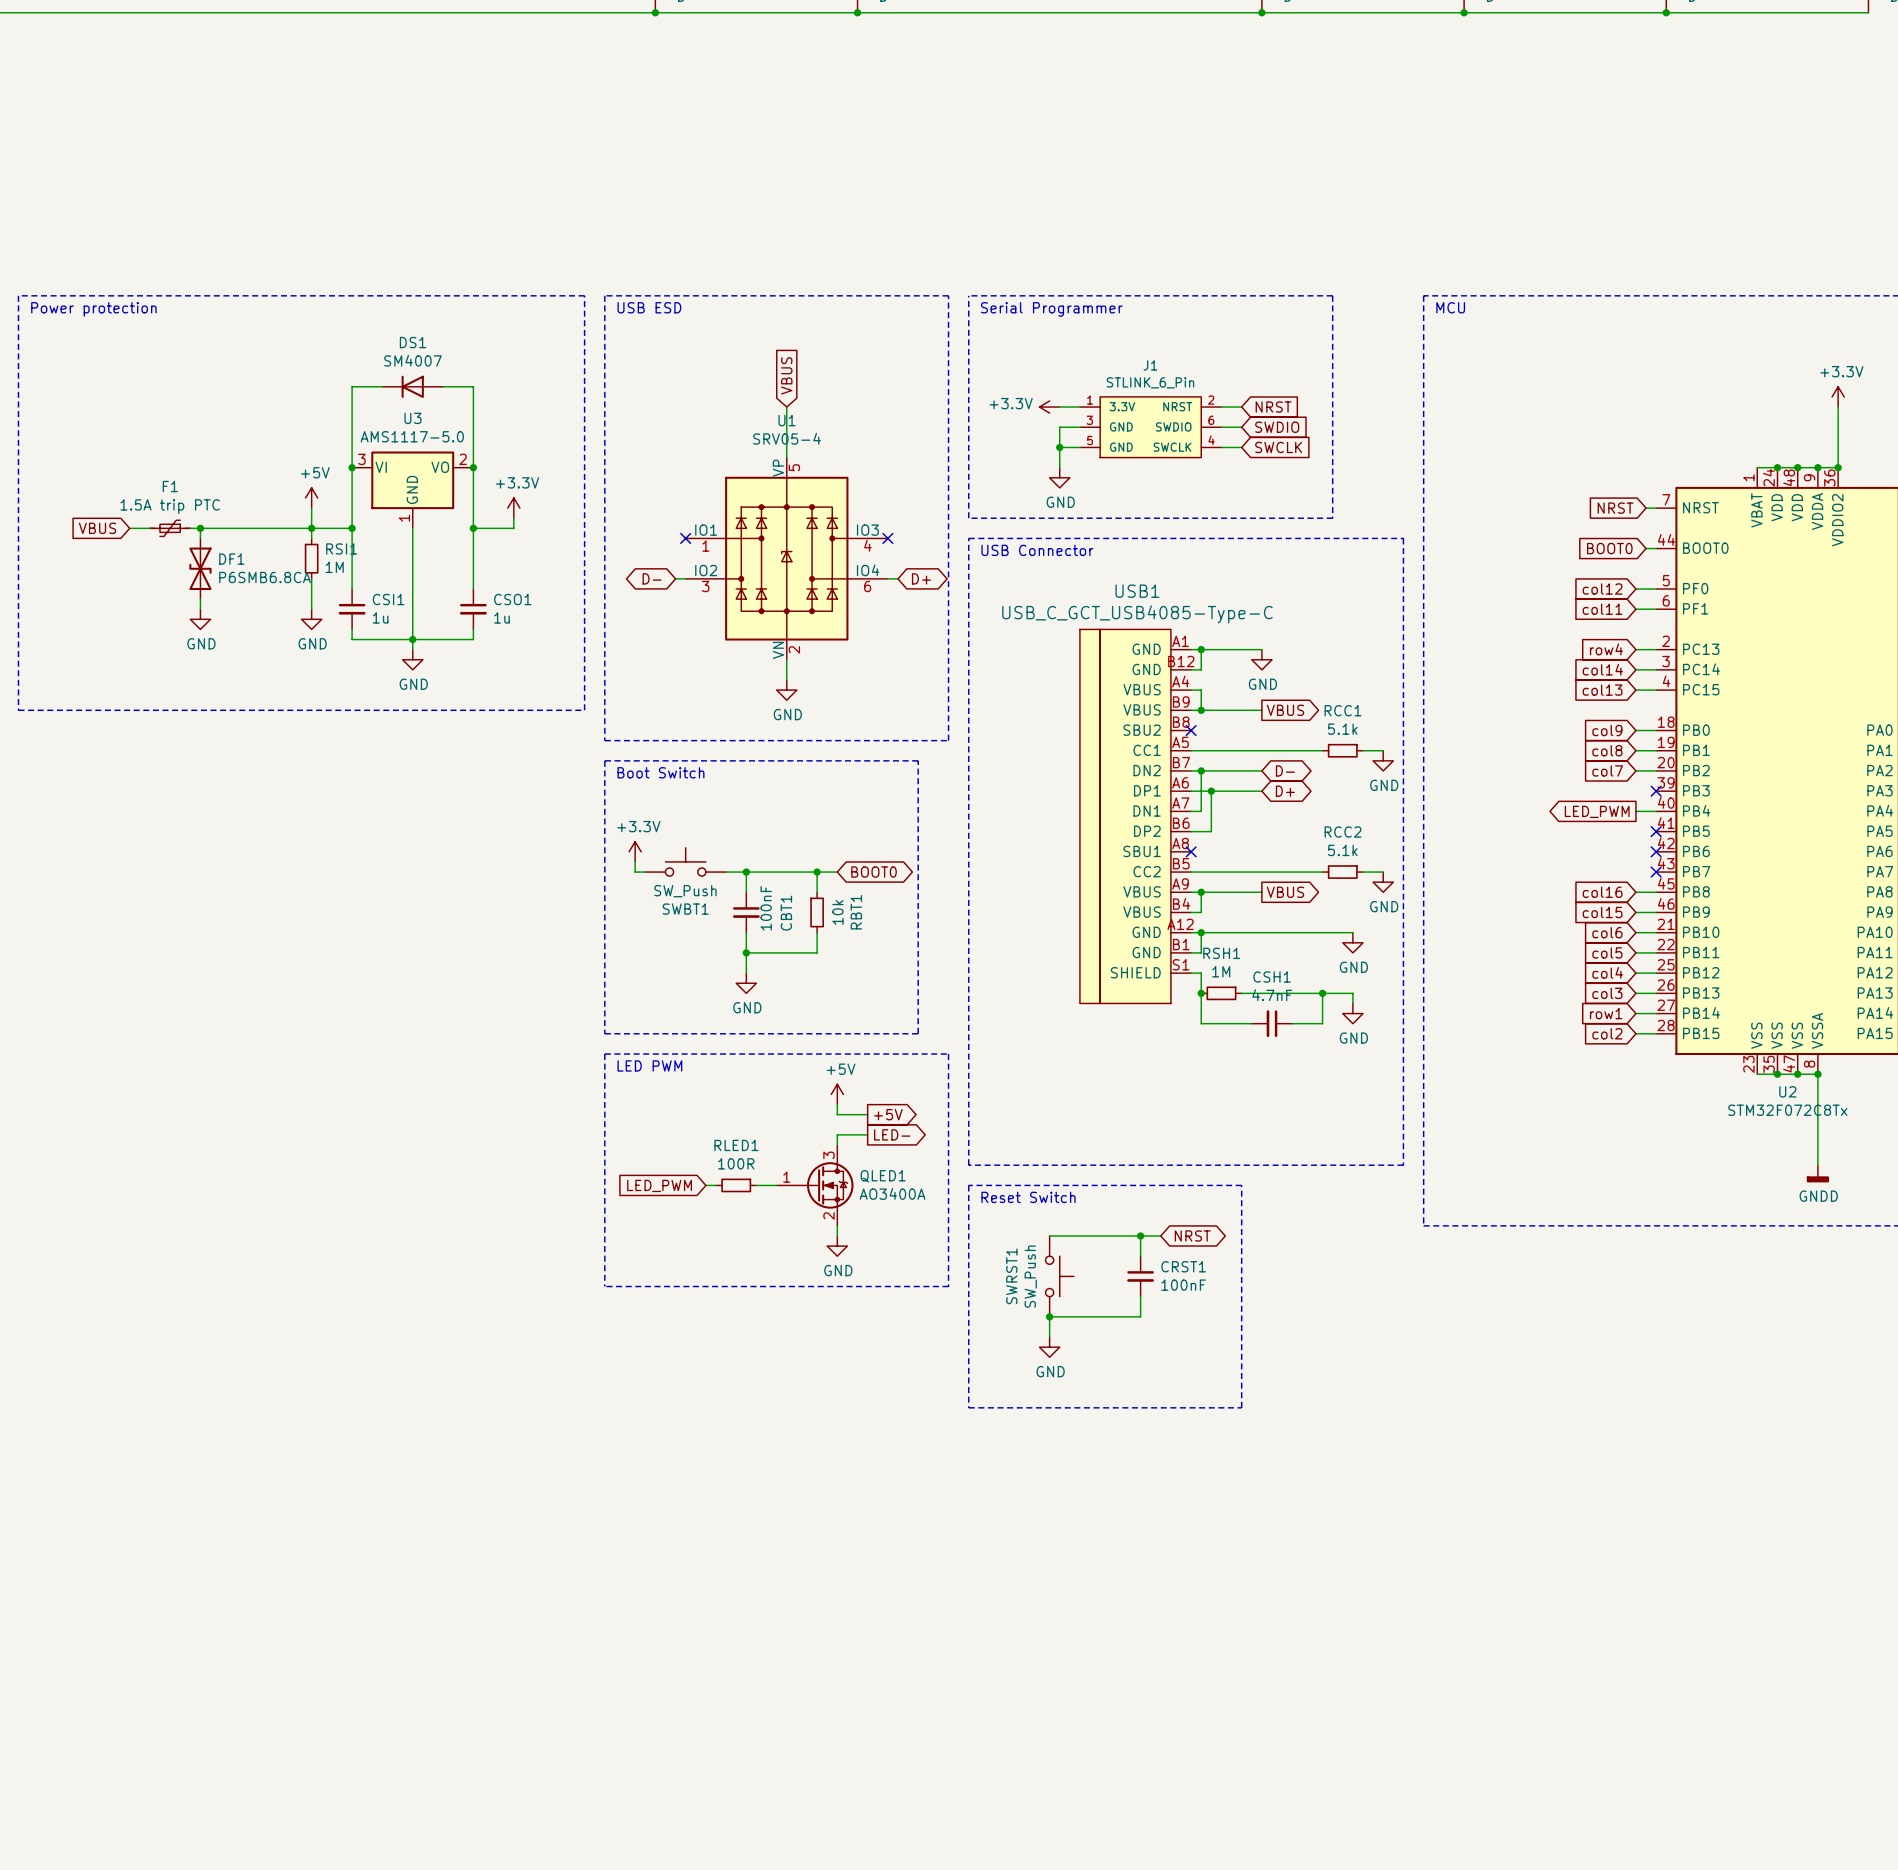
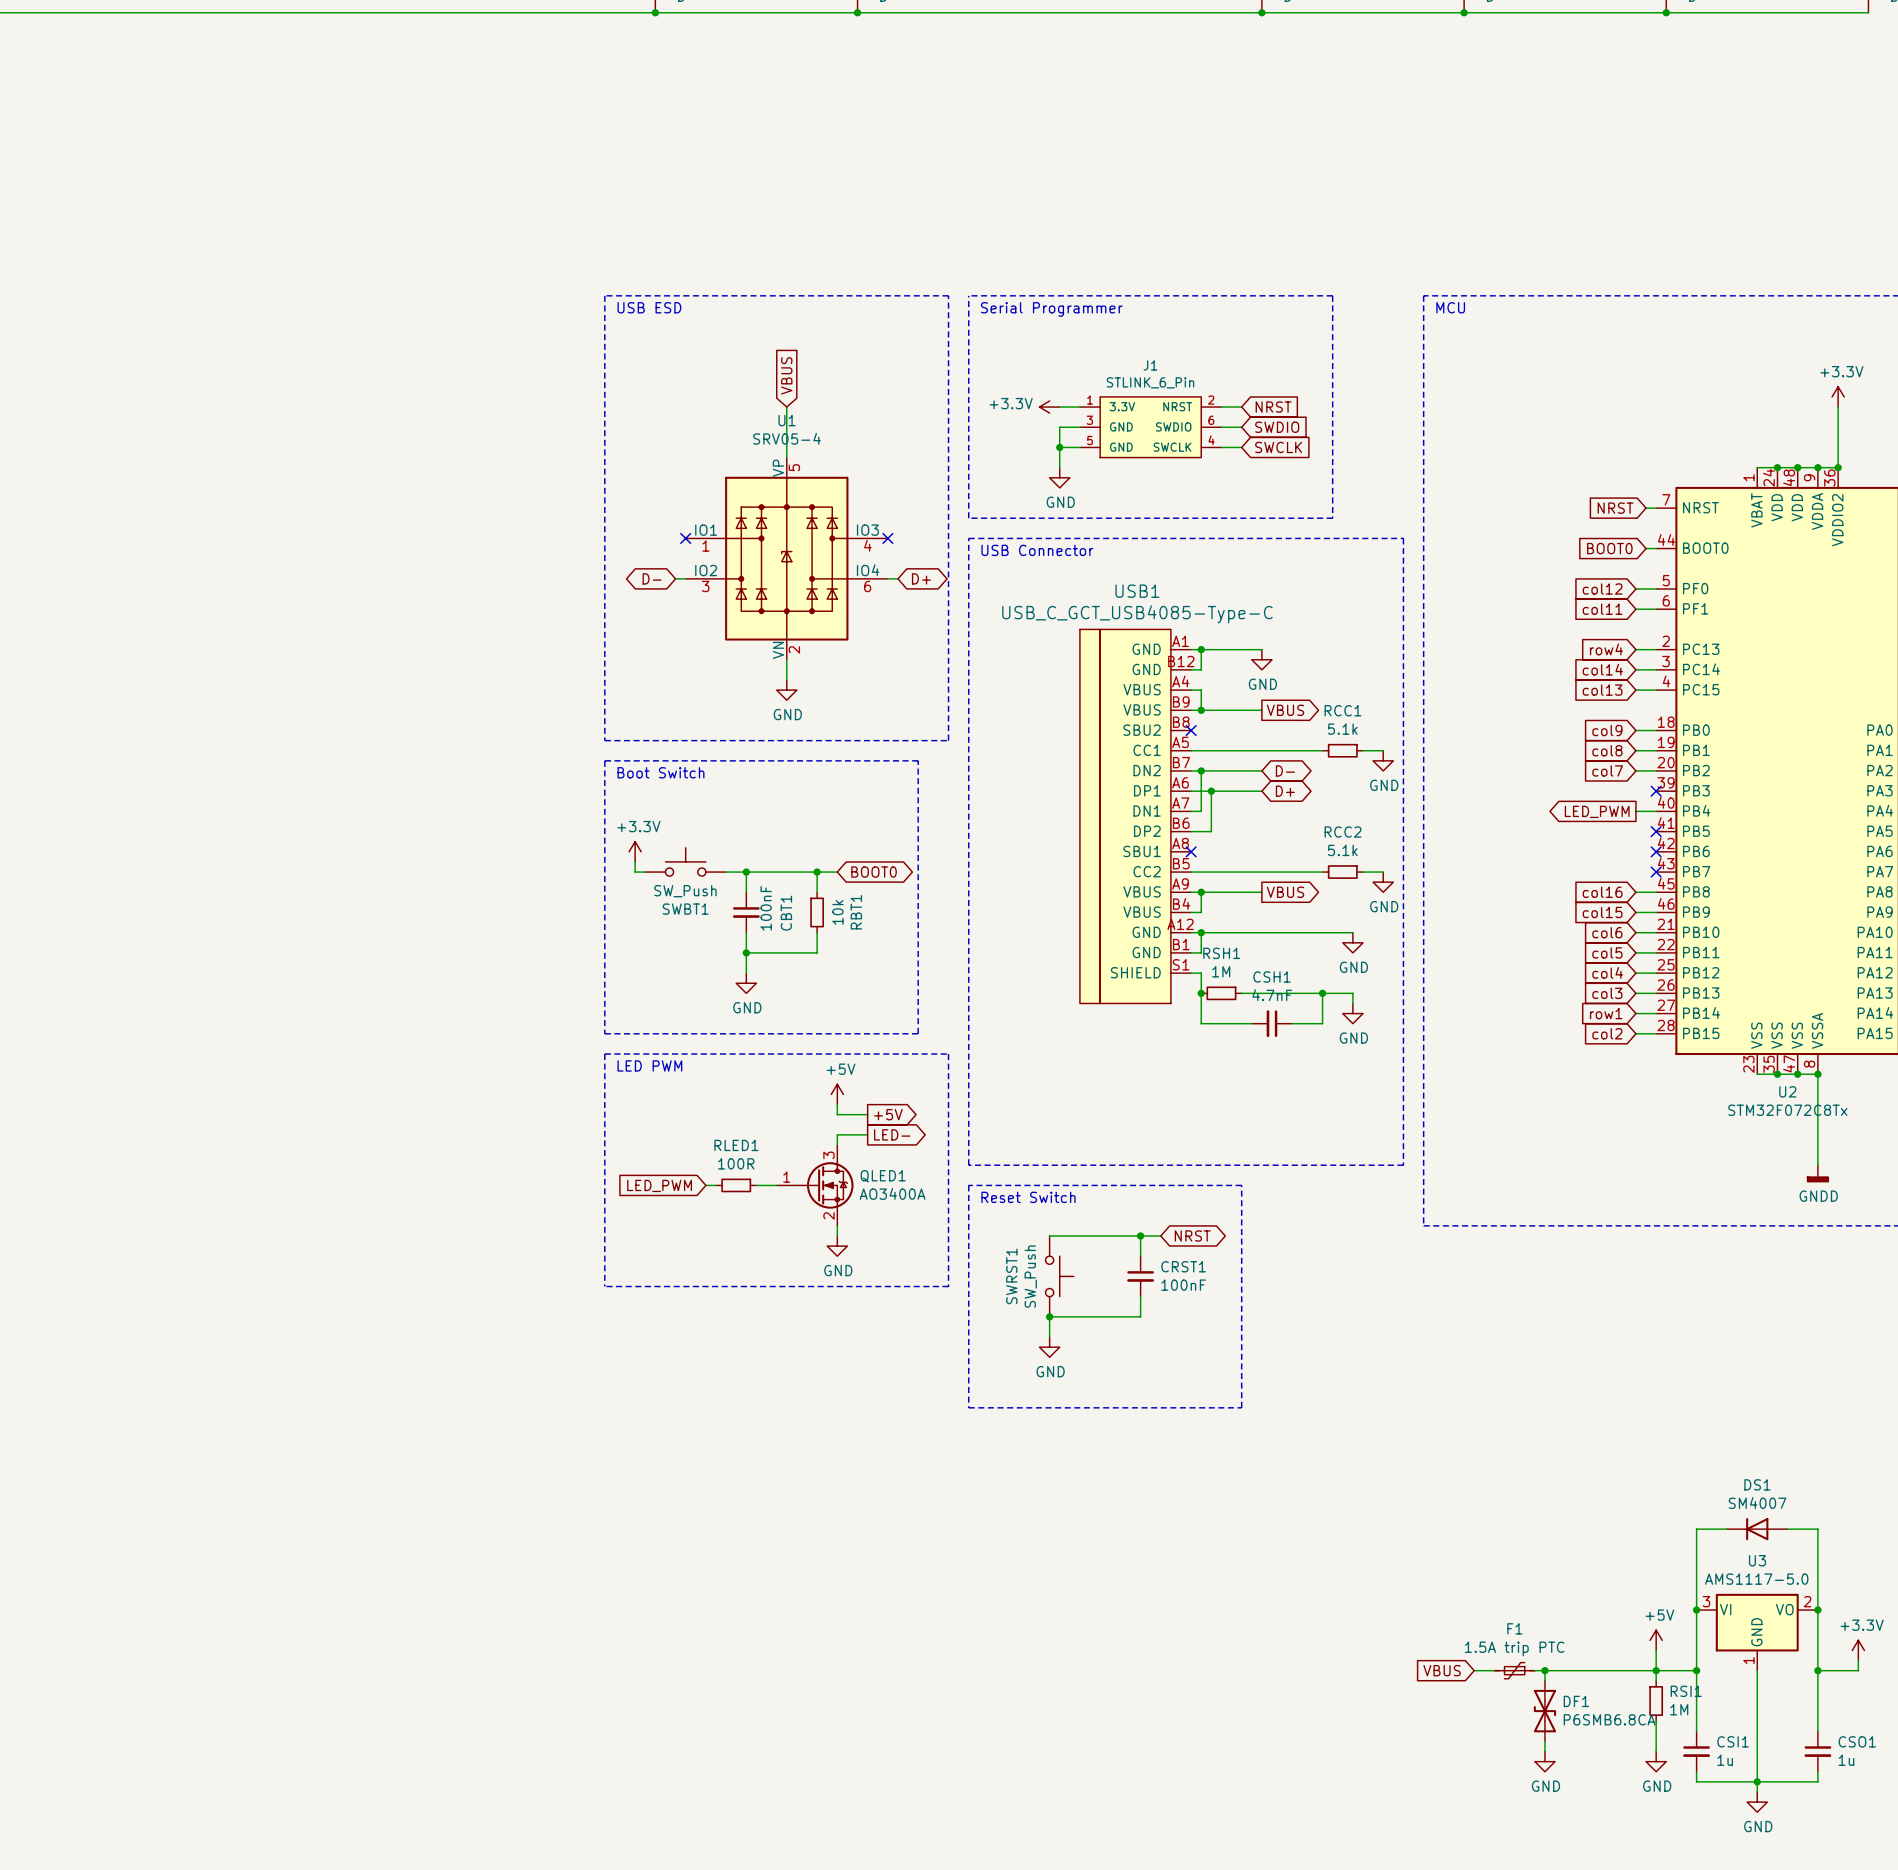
line: (18, 295) (18, 710) (584, 710) (584, 295) (18, 295) -> none
text: Power protection (93, 309) -> none
wire: (382, 386) (352, 386) (352, 588) -> none
DS1 position: (412, 386) -> (1757, 1529)
wire: (443, 386) (473, 386) (473, 588) -> none
junction: (352, 467) -> none
junction: (473, 467) -> none
U3 position: (412, 489) -> (1757, 1632)
power symbol: +5V (311, 498) -> none
wire: (311, 508) (311, 538) -> none
power symbol: +3.3V (513, 508) -> none
wire: (513, 518) (513, 528) (473, 528) -> none
global label: VBUS (97, 528) -> none
wire: (129, 528) (149, 528) -> none
F1 position: (170, 528) -> (1514, 1670)
wire: (190, 528) (352, 528) -> none
wire: (200, 528) (200, 538) -> none
junction: (200, 528) -> none
junction: (311, 528) -> none
junction: (352, 528) -> none
wire: (412, 528) (412, 649) -> none
junction: (473, 528) -> none
RSI1 position: (311, 558) -> (1656, 1701)
DF1 position: (200, 568) -> (1544, 1711)
wire: (311, 578) (311, 609) -> none
wire: (200, 599) (200, 609) -> none
CSI1 position: (352, 609) -> (1696, 1751)
CSO1 position: (473, 609) -> (1817, 1751)
power symbol: GND (200, 619) -> none
power symbol: GND (311, 619) -> none
wire: (352, 629) (352, 639) (473, 639) (473, 629) -> none
junction: (412, 639) -> none
power symbol: GND (412, 659) -> none
wire: none -> (1726, 1529) (1696, 1529) (1696, 1731)
wire: none -> (1787, 1529) (1817, 1529) (1817, 1731)
junction: none -> (1696, 1610)
junction: none -> (1817, 1610)
power symbol: none -> +5V (1656, 1640)
wire: none -> (1656, 1650) (1656, 1680)
power symbol: none -> +3.3V (1858, 1650)
wire: none -> (1858, 1660) (1858, 1670) (1817, 1670)
global label: none -> VBUS (1442, 1670)
wire: none -> (1474, 1670) (1494, 1670)
wire: none -> (1534, 1670) (1696, 1670)
wire: none -> (1544, 1670) (1544, 1680)
junction: none -> (1544, 1670)
junction: none -> (1656, 1670)
junction: none -> (1696, 1670)
wire: none -> (1757, 1670) (1757, 1791)
junction: none -> (1817, 1670)
wire: none -> (1656, 1721) (1656, 1751)
wire: none -> (1544, 1741) (1544, 1751)
power symbol: none -> GND (1544, 1761)
power symbol: none -> GND (1656, 1761)
wire: none -> (1696, 1771) (1696, 1781) (1817, 1781) (1817, 1771)
junction: none -> (1757, 1781)
power symbol: none -> GND (1757, 1802)

